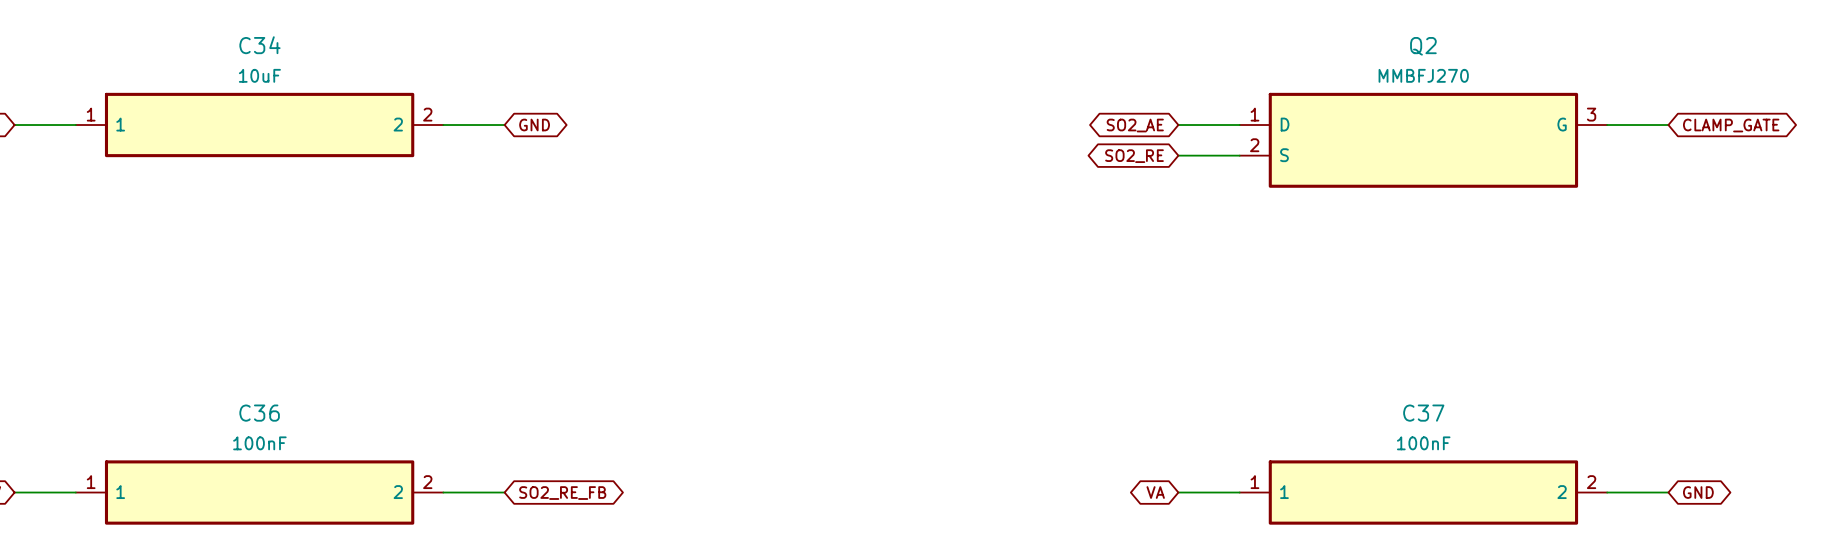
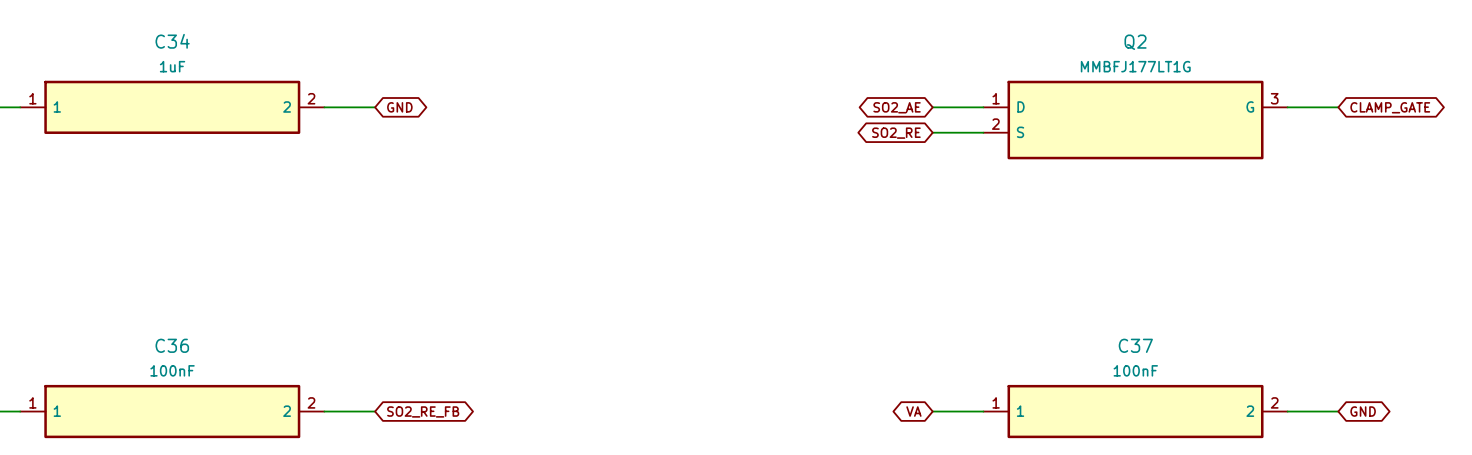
C34 value: 10uF (259, 75) -> 1uF (172, 66)
Q2 value: MMBFJ270 (1423, 75) -> MMBFJ177LT1G (1135, 66)

